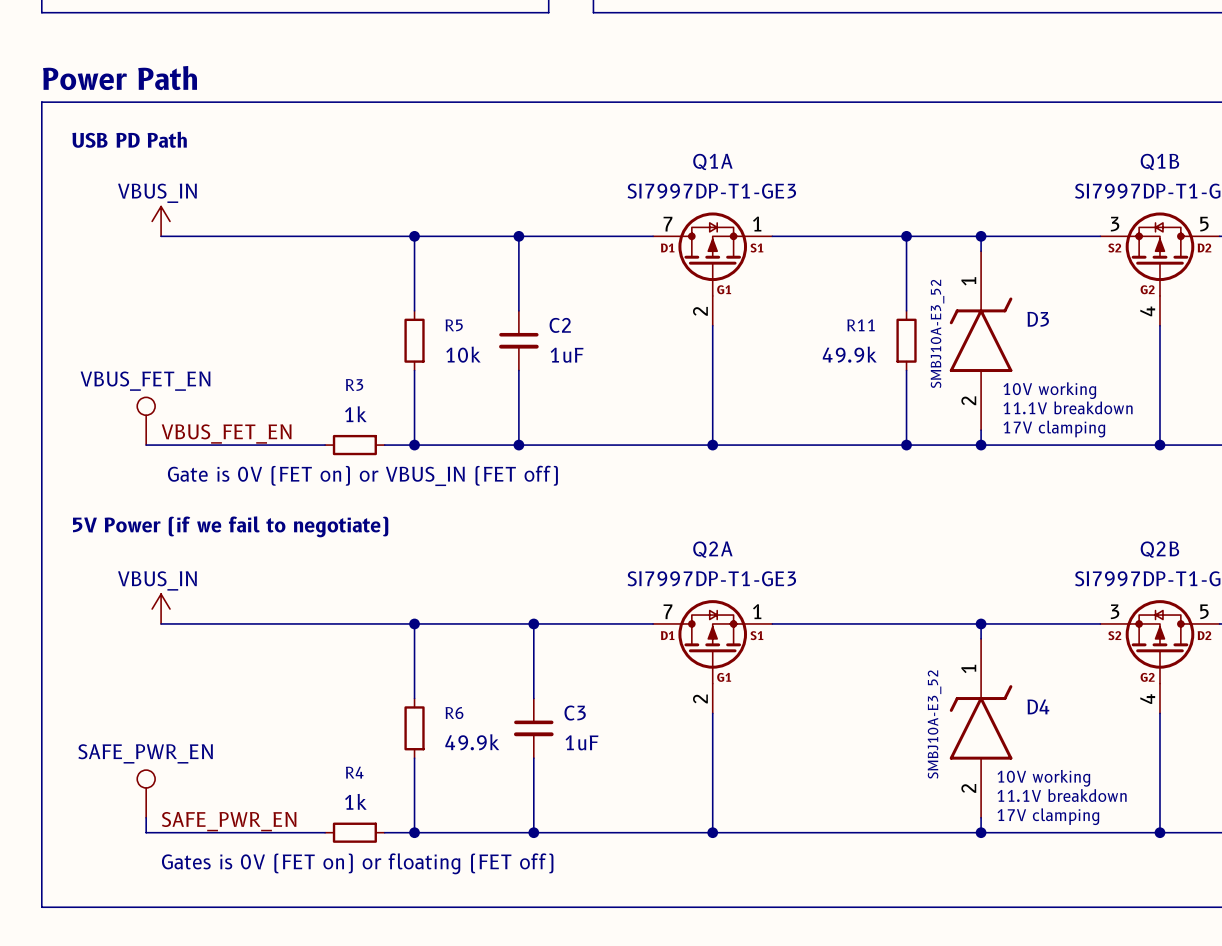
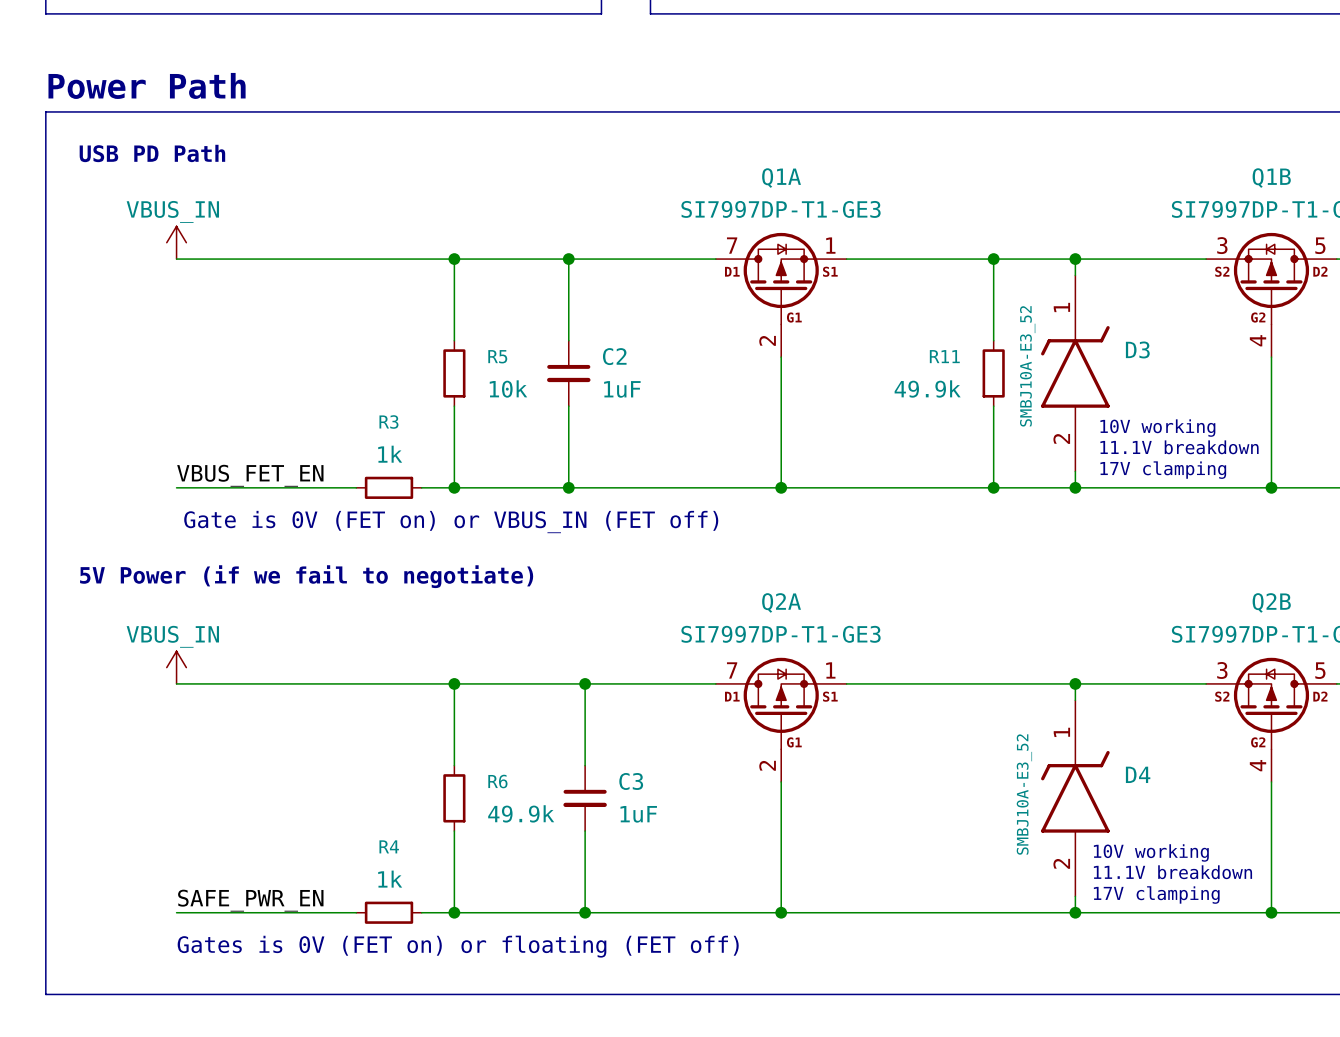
part: VBUS_FET_EN (146, 421) -> none
wire: (146, 445) (161, 445) -> none
part: SAFE_PWR_EN (146, 793) -> none
wire: (146, 817) (146, 832) (161, 832) -> none

